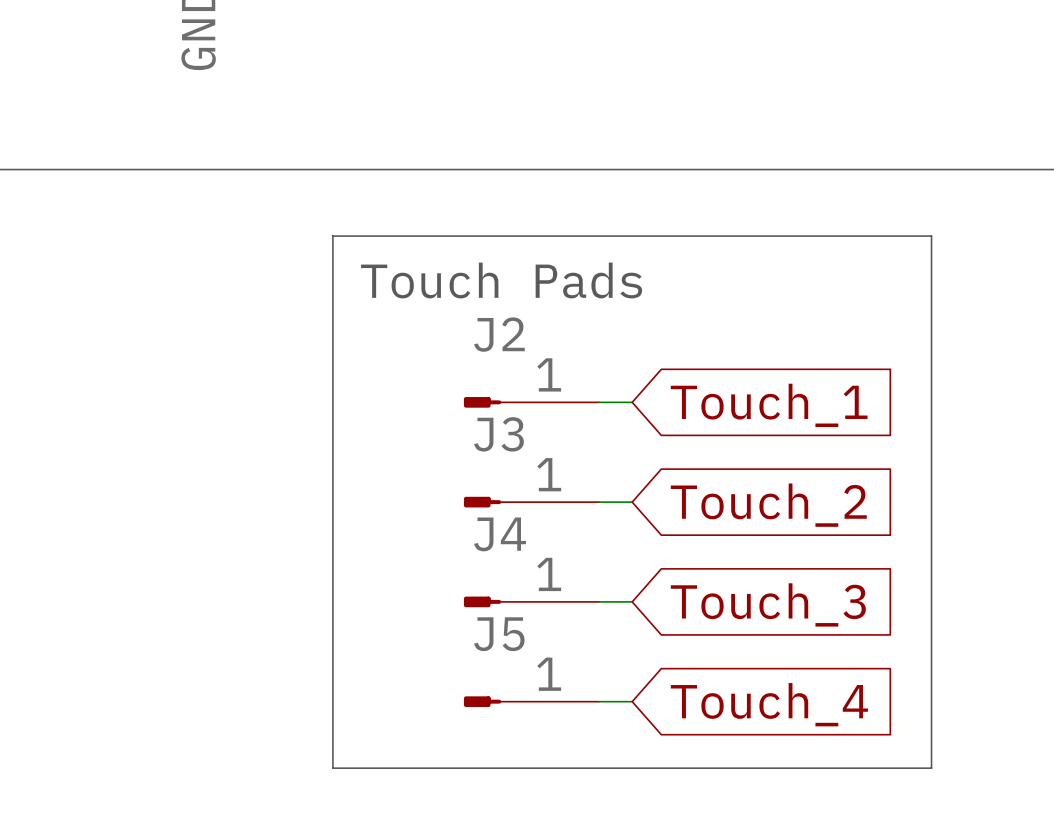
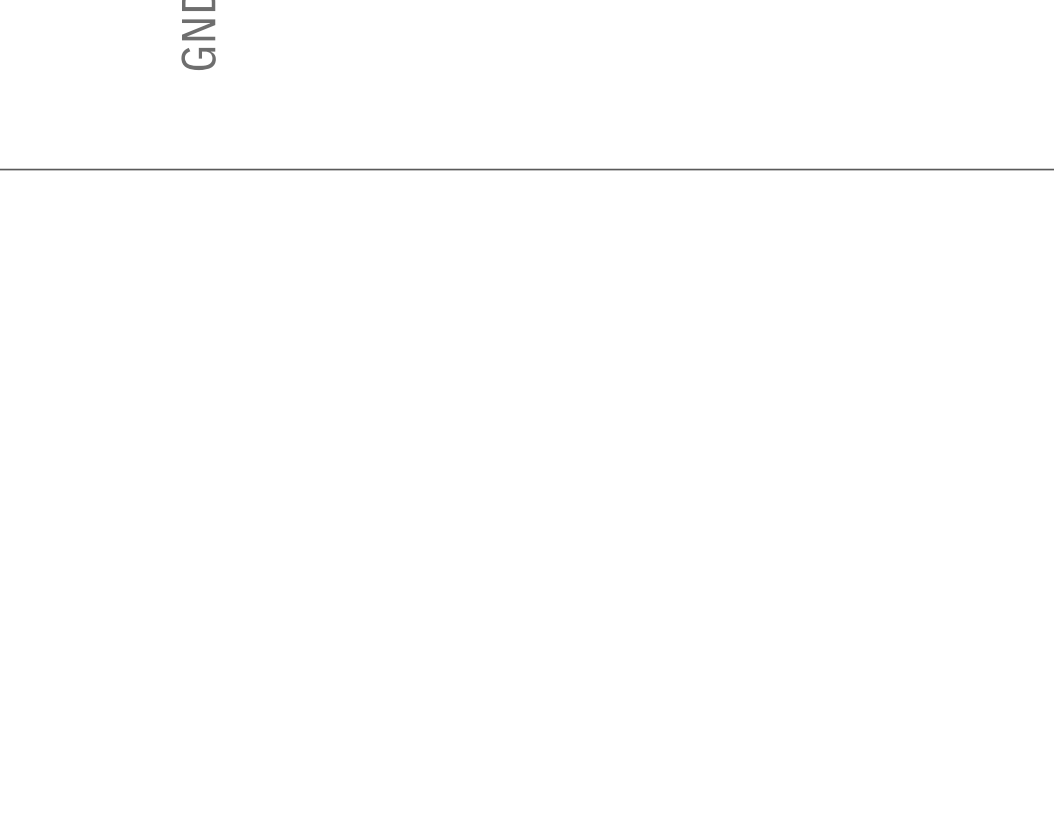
line: (332, 236) (931, 236) (931, 768) (332, 768) (332, 236) -> none
text: Touch Pads (501, 280) -> none
J2: (531, 402) -> none
wire: (598, 402) (632, 402) -> none
global label: Touch_1 (769, 405) -> none
J3: (531, 502) -> none
wire: (598, 502) (632, 502) -> none
global label: Touch_2 (768, 505) -> none
J4: (531, 601) -> none
wire: (598, 601) (632, 601) -> none
global label: Touch_3 (768, 604) -> none
J5: (531, 701) -> none
wire: (598, 701) (632, 701) -> none
global label: Touch_4 (769, 704) -> none

